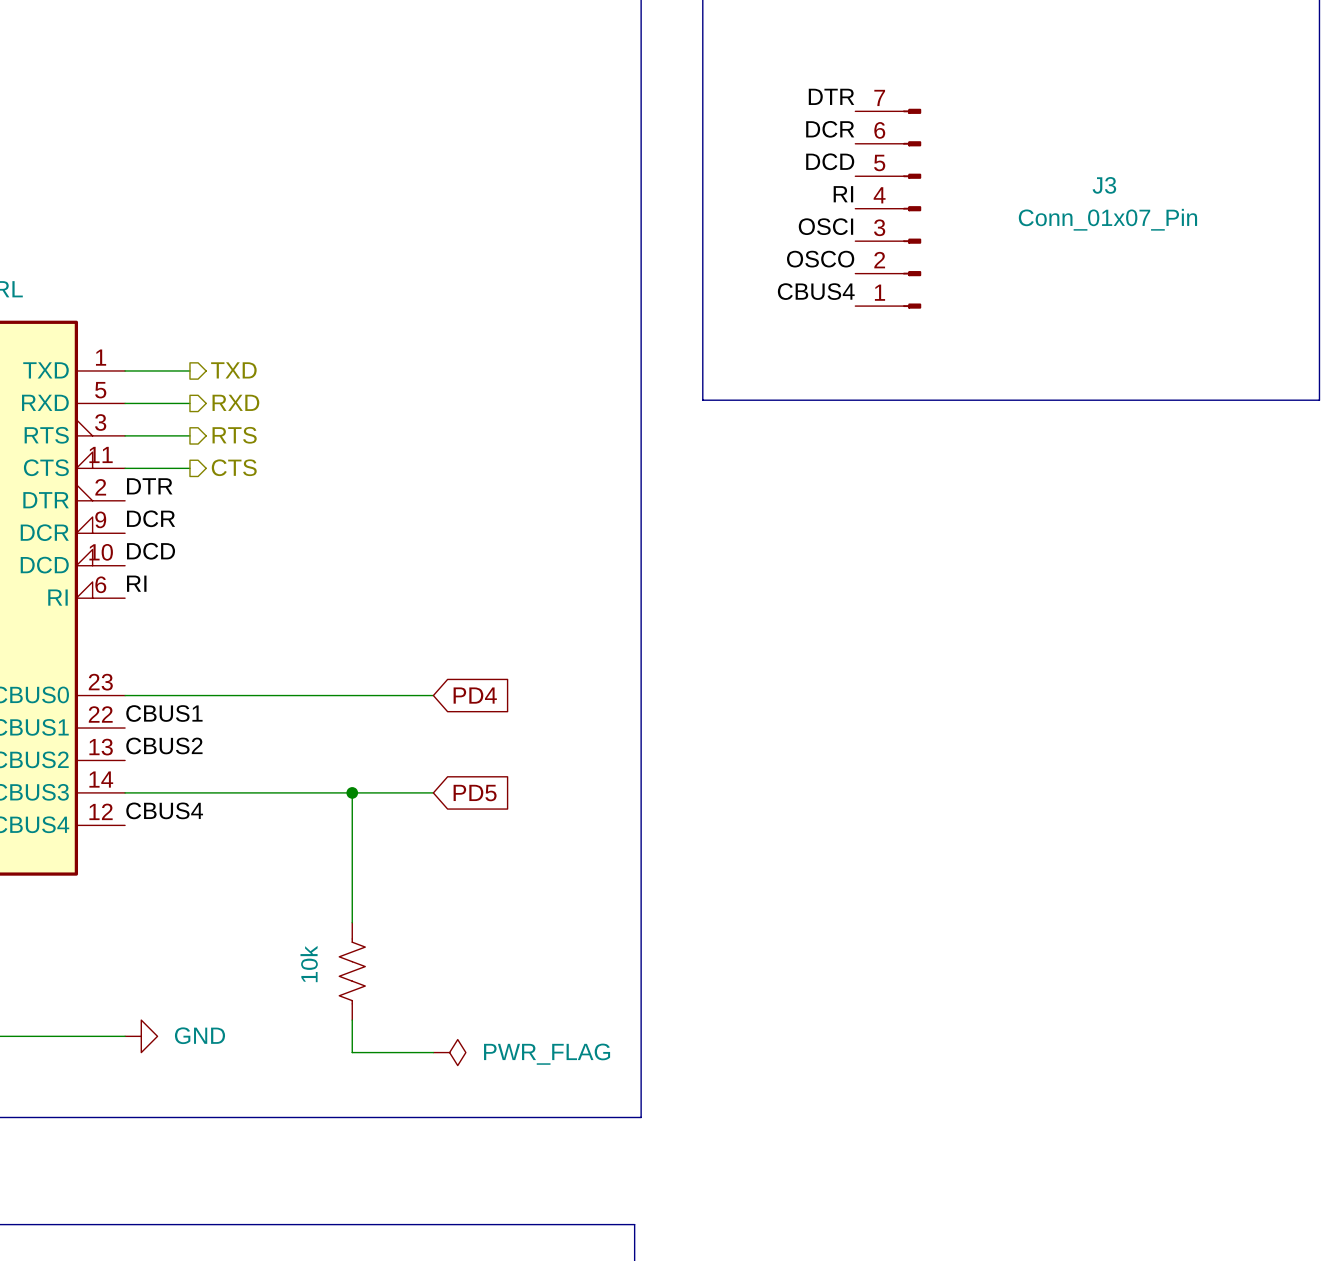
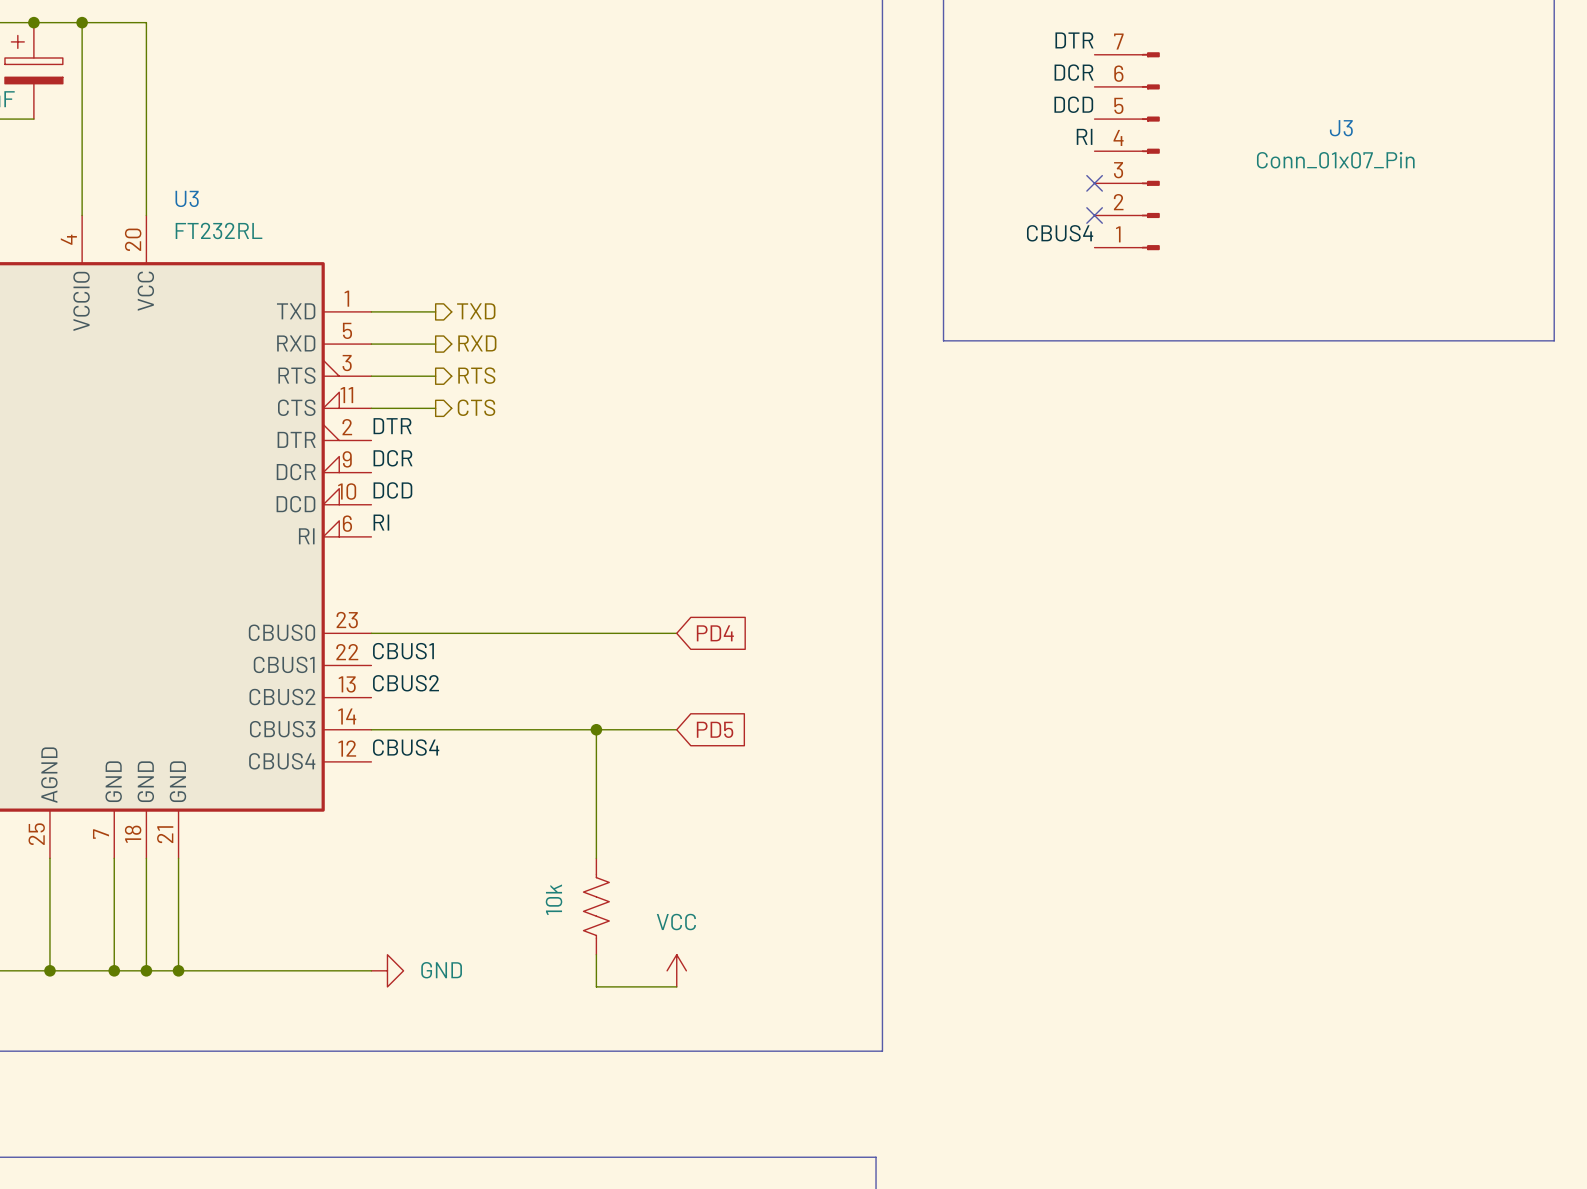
label: OSCI (825, 226) -> none
no-connect mark: none -> (1094, 183)
label: OSCO (820, 259) -> none
no-connect mark: none -> (1094, 215)
power symbol: none -> VCC (676, 970)
power symbol: PWR_FLAG (449, 1052) -> none

